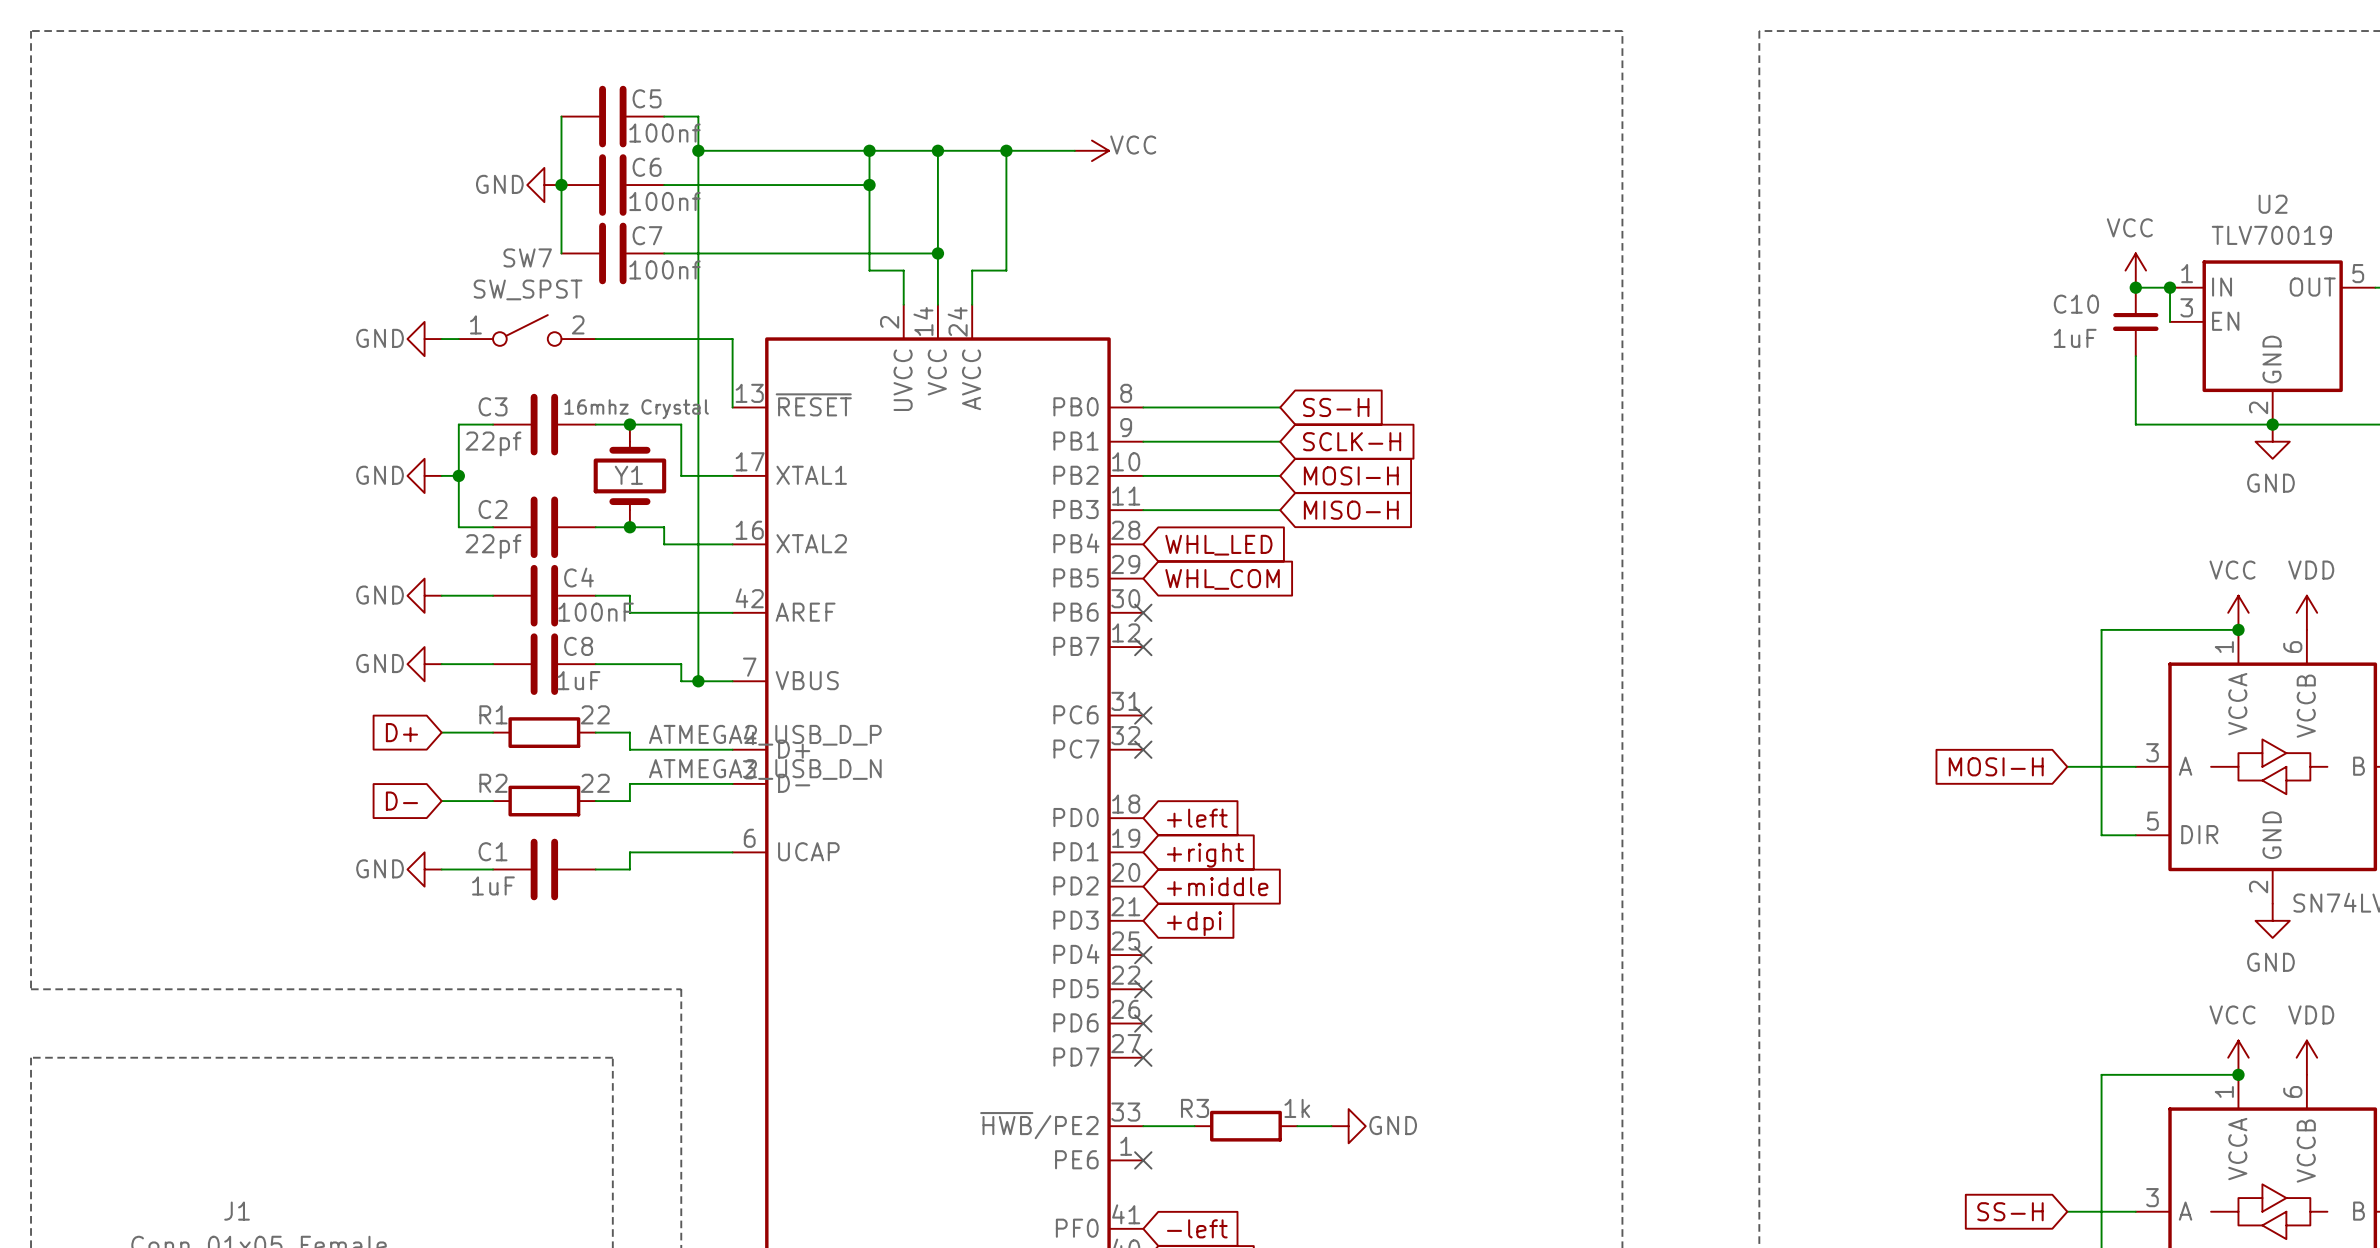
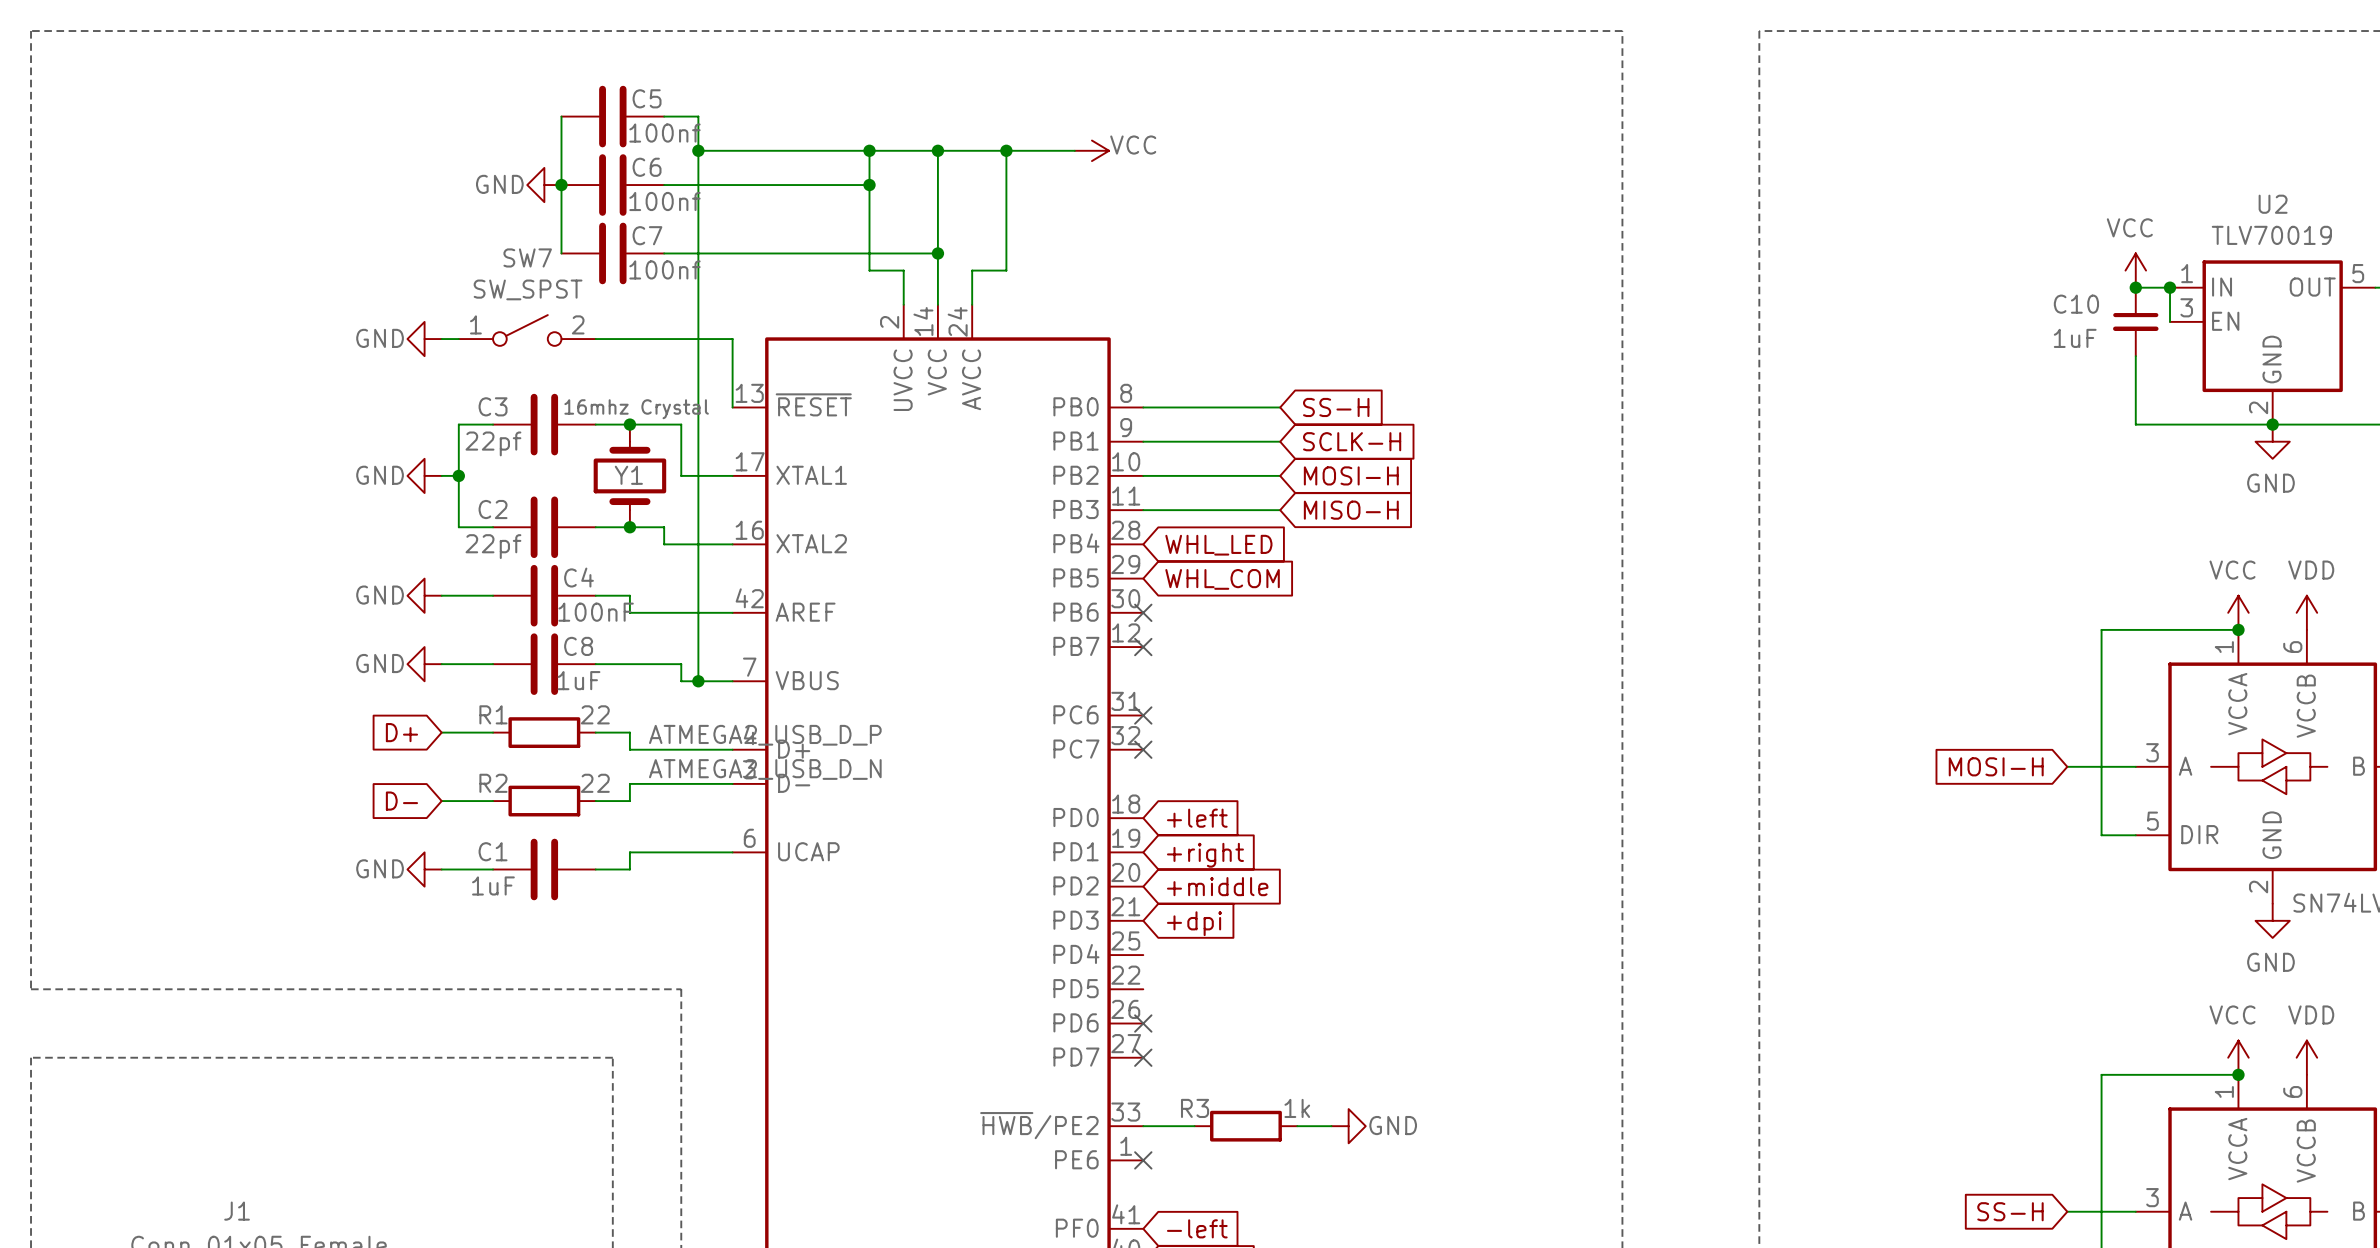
no-connect mark: (1143, 955) -> none
no-connect mark: (1143, 989) -> none

